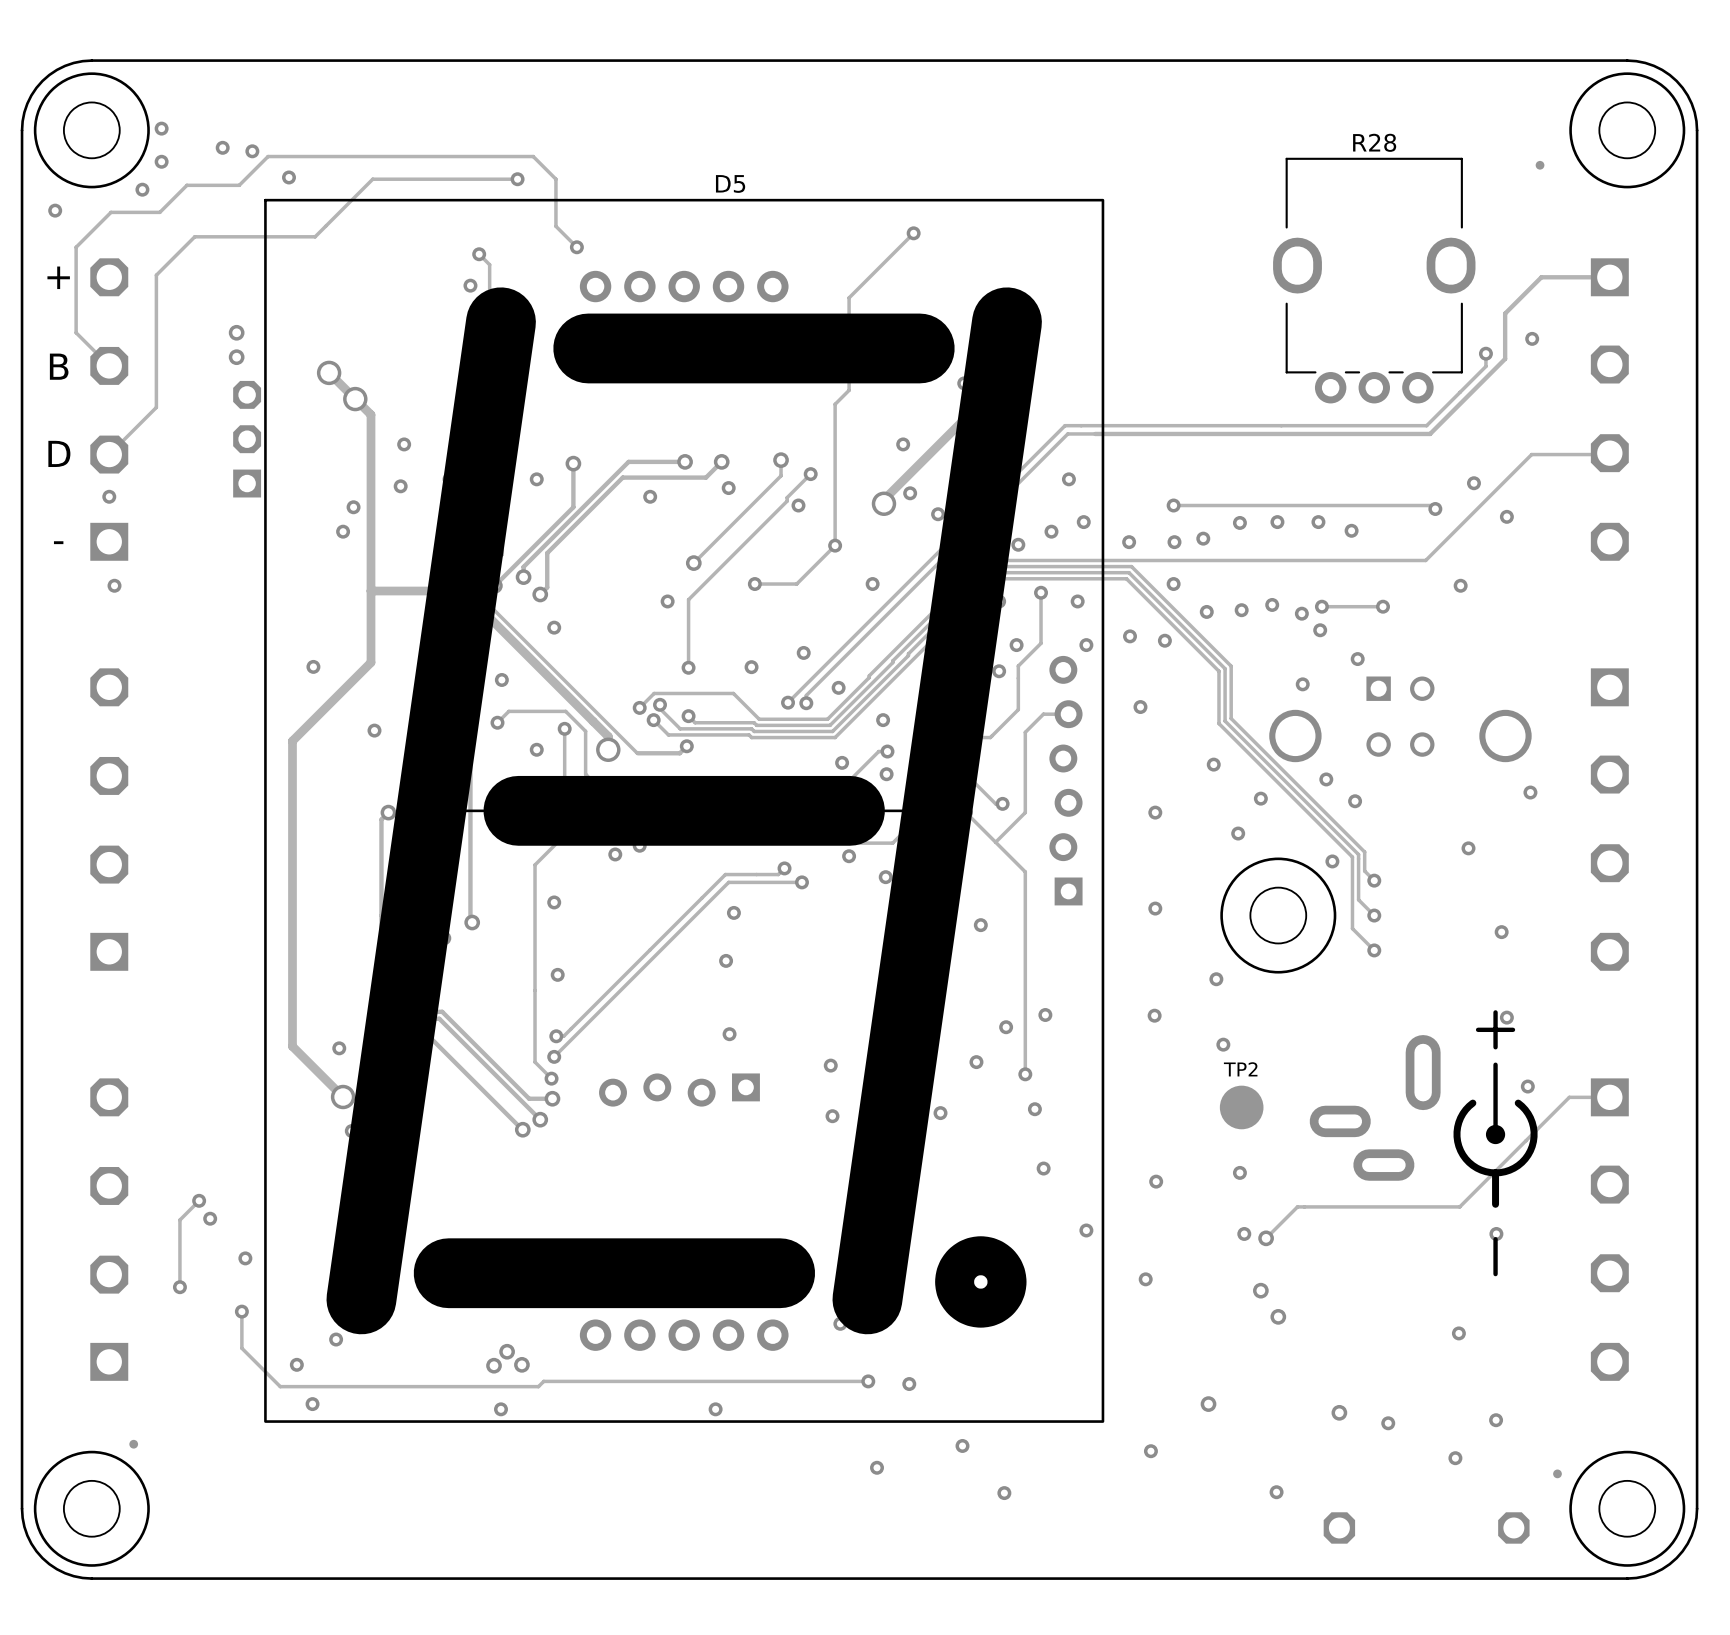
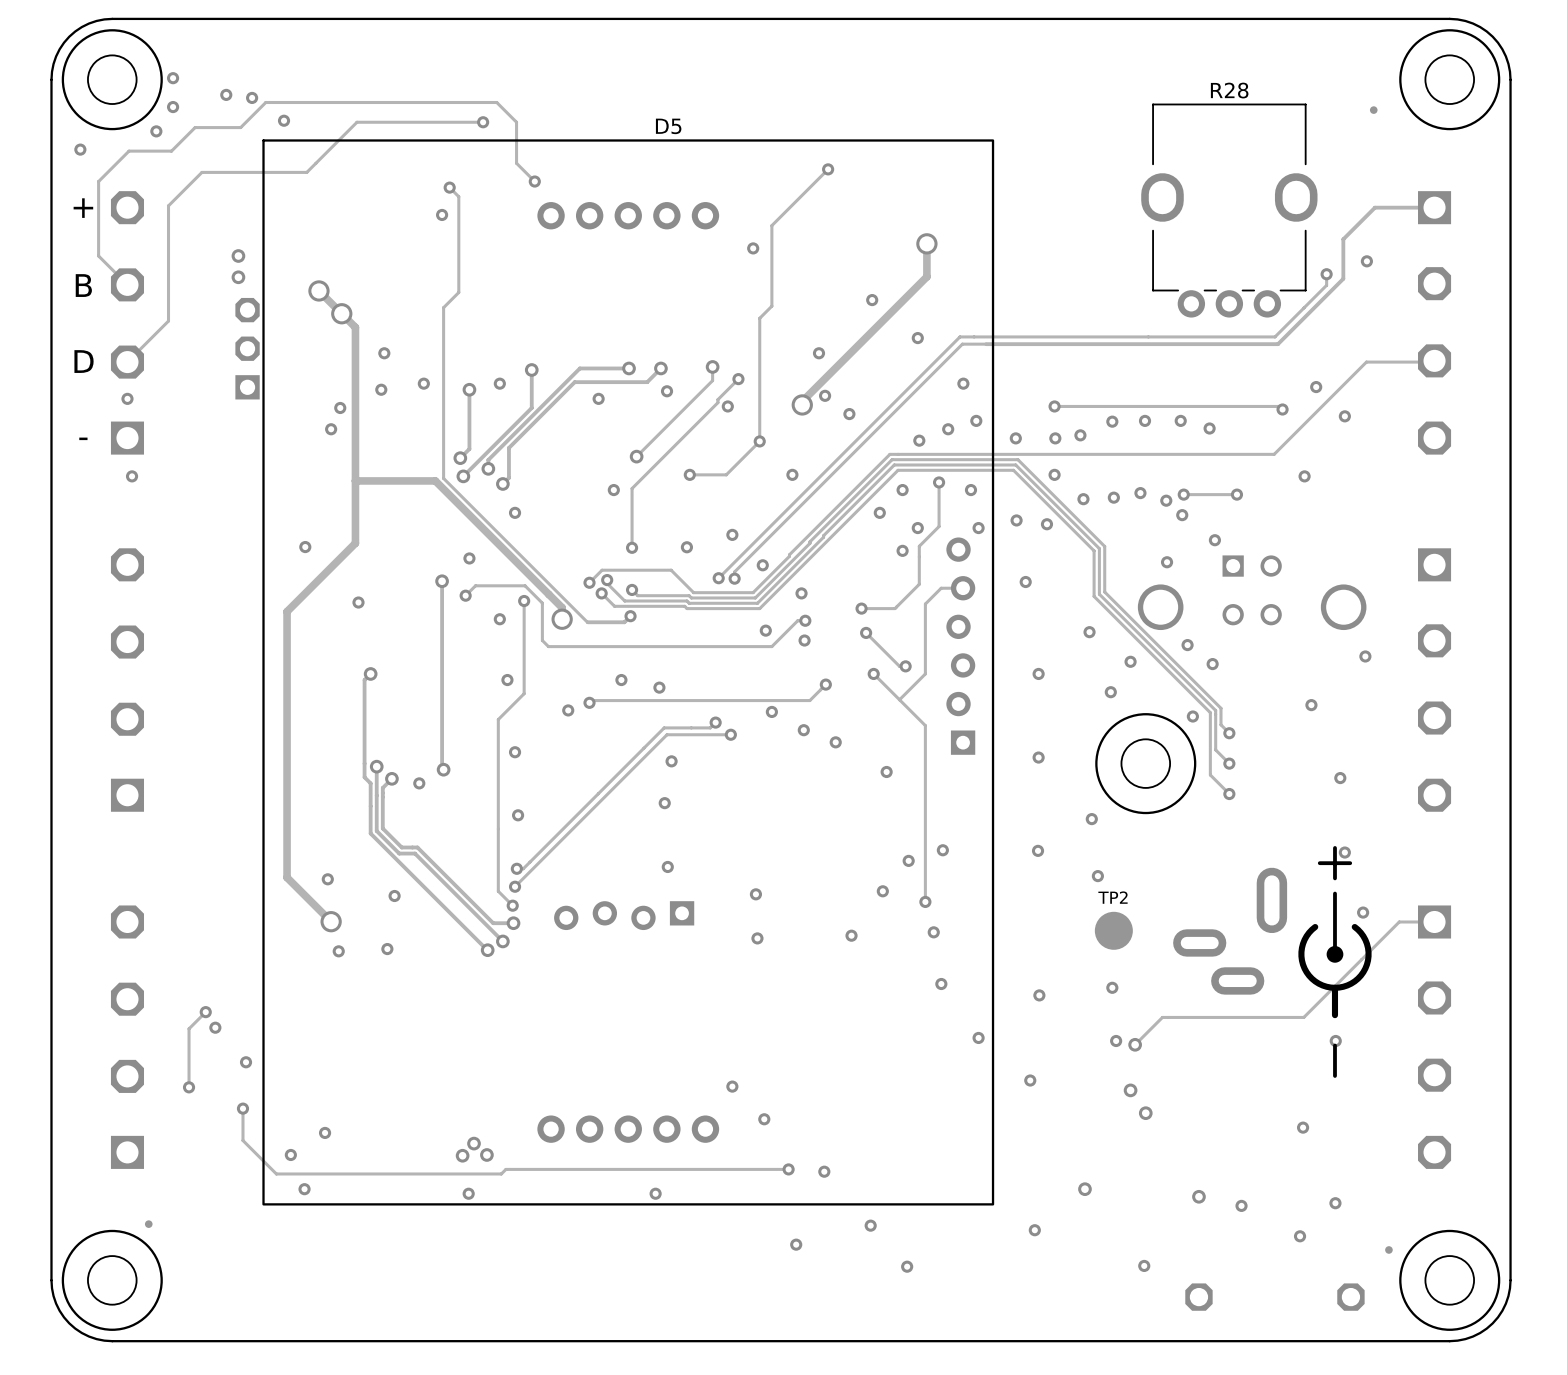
D5 footprint: [264, 198, 1105, 1423] -> [262, 139, 995, 1206]

